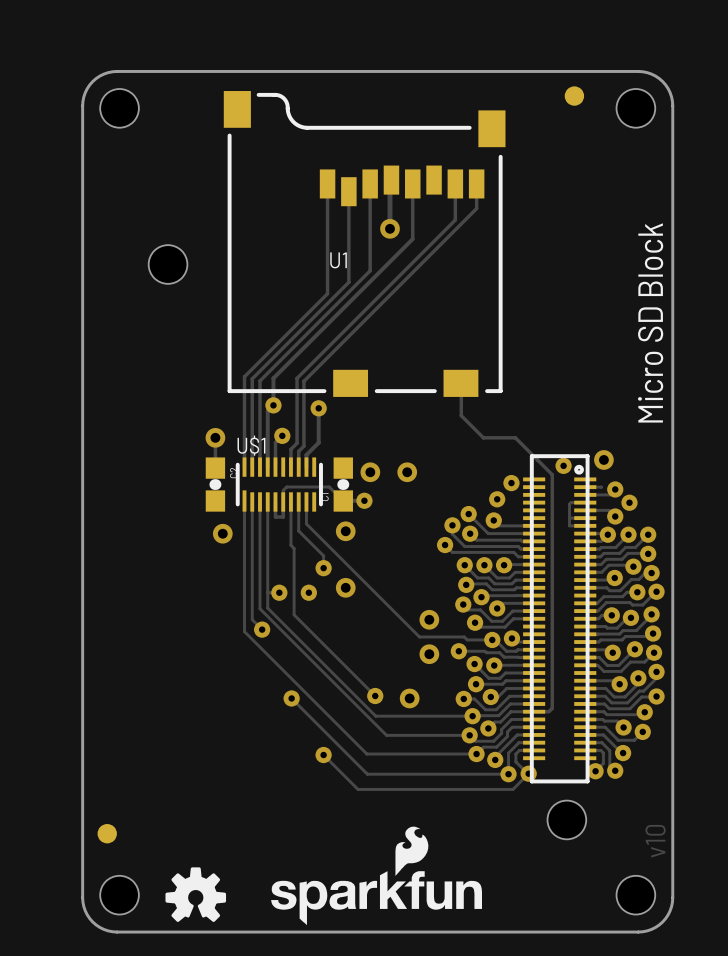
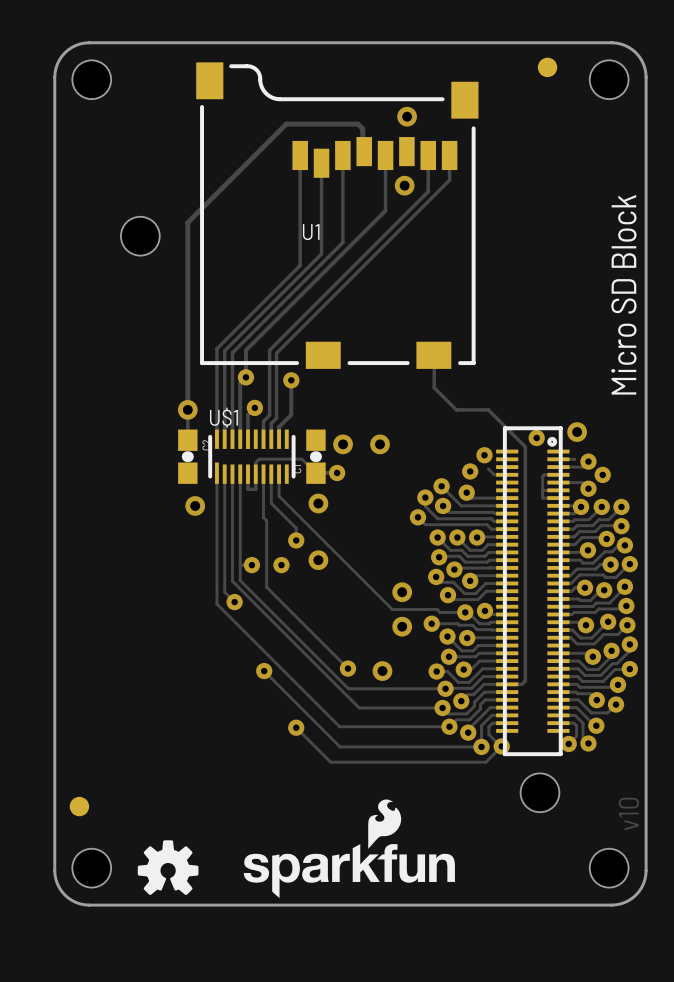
via: none -> (407, 116)
track: (390, 181) (390, 228) -> (362, 153) (362, 129) (357, 124) (286, 124) (187, 222) (187, 409)
via position: (390, 228) -> (404, 185)
track: none -> (488, 469) (494, 474) (507, 474)

